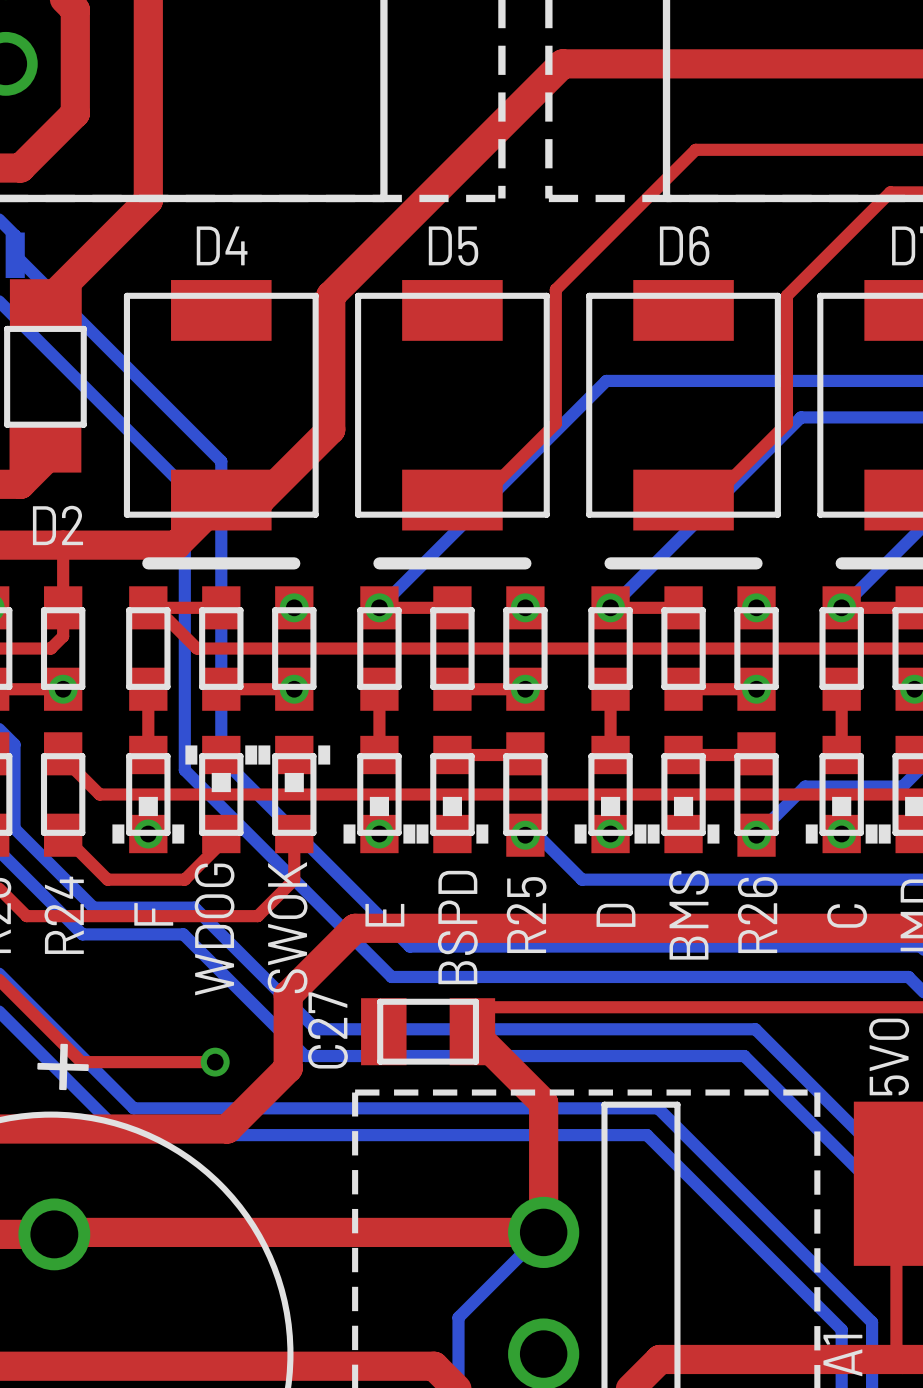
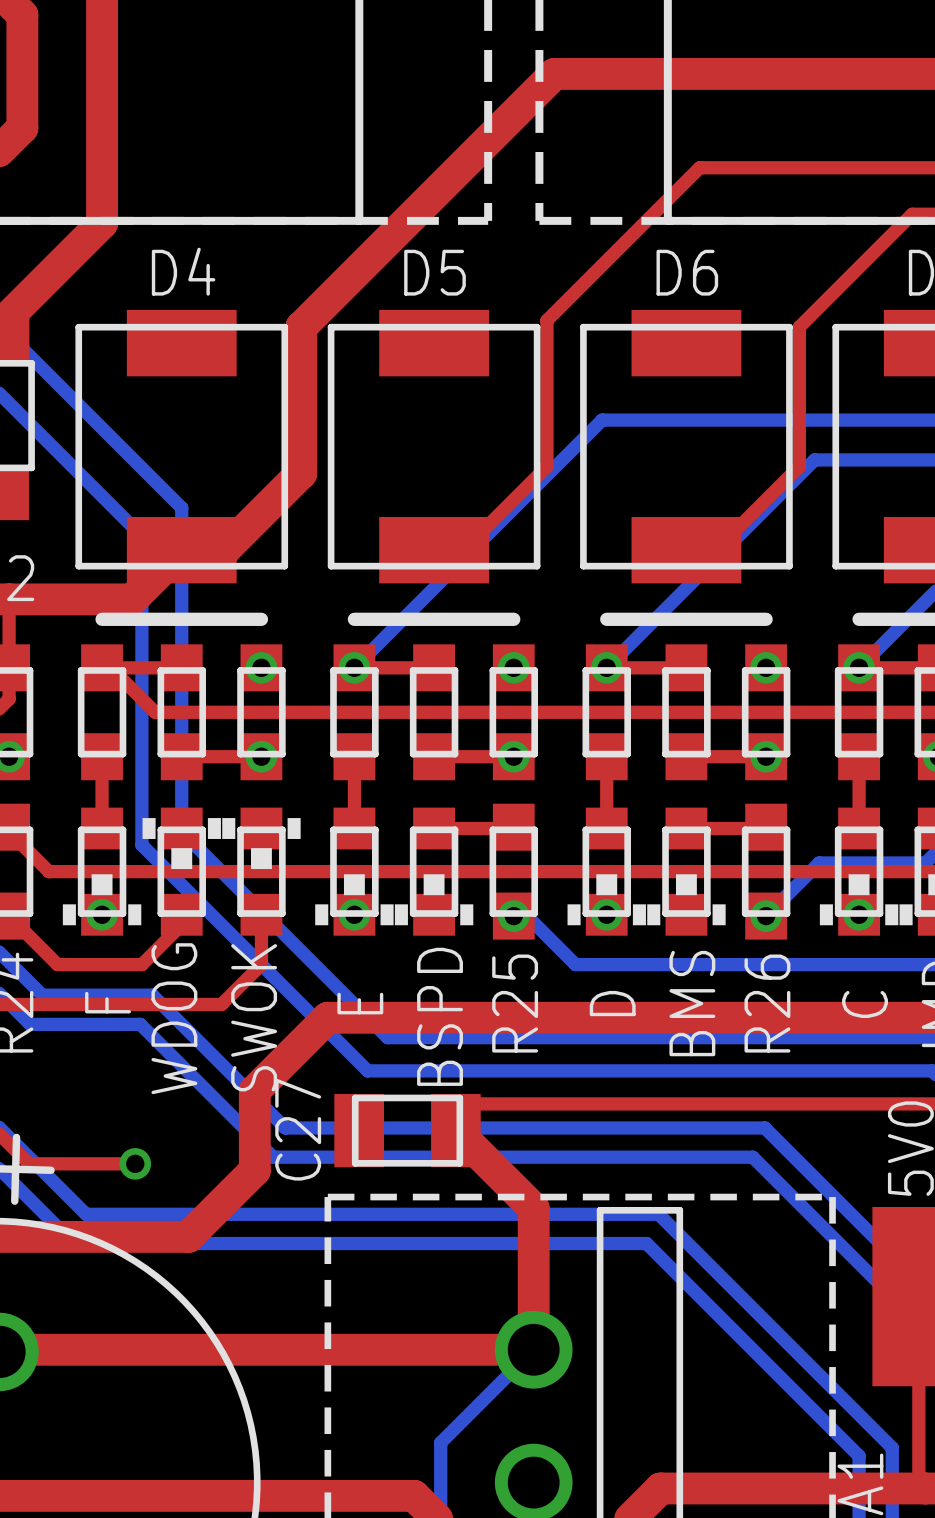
top track: (178, 1062) (215, 1062) -> none
via position: (215, 1062) -> (135, 1163)

